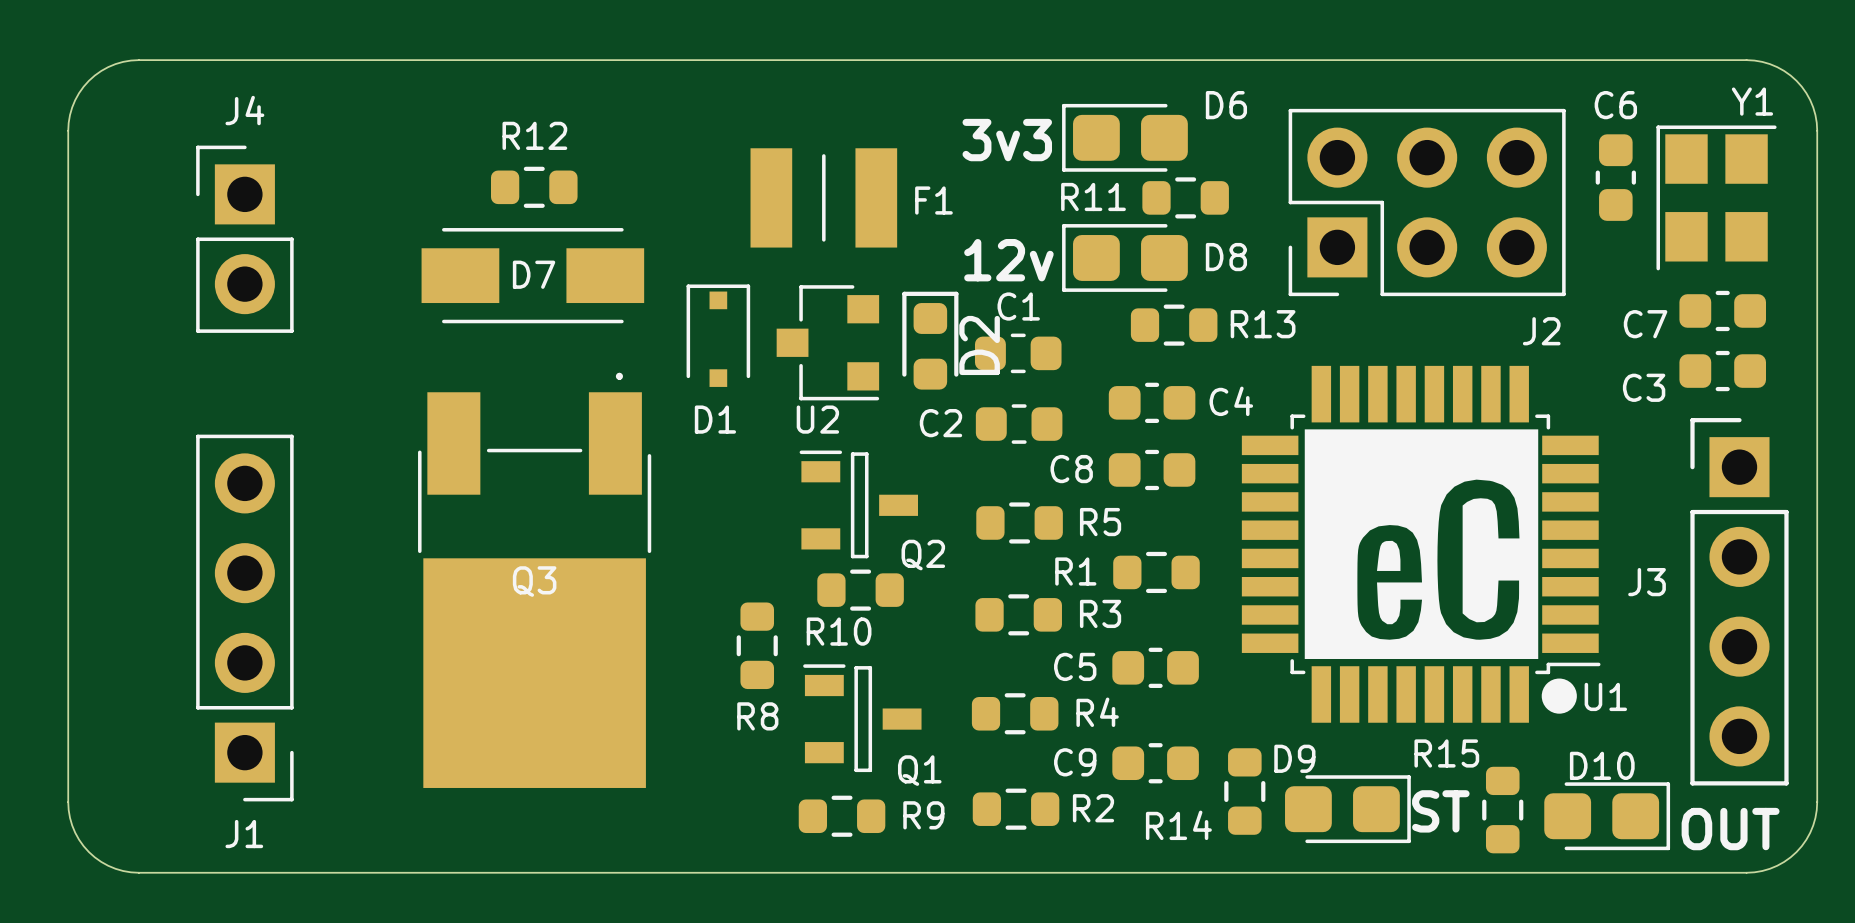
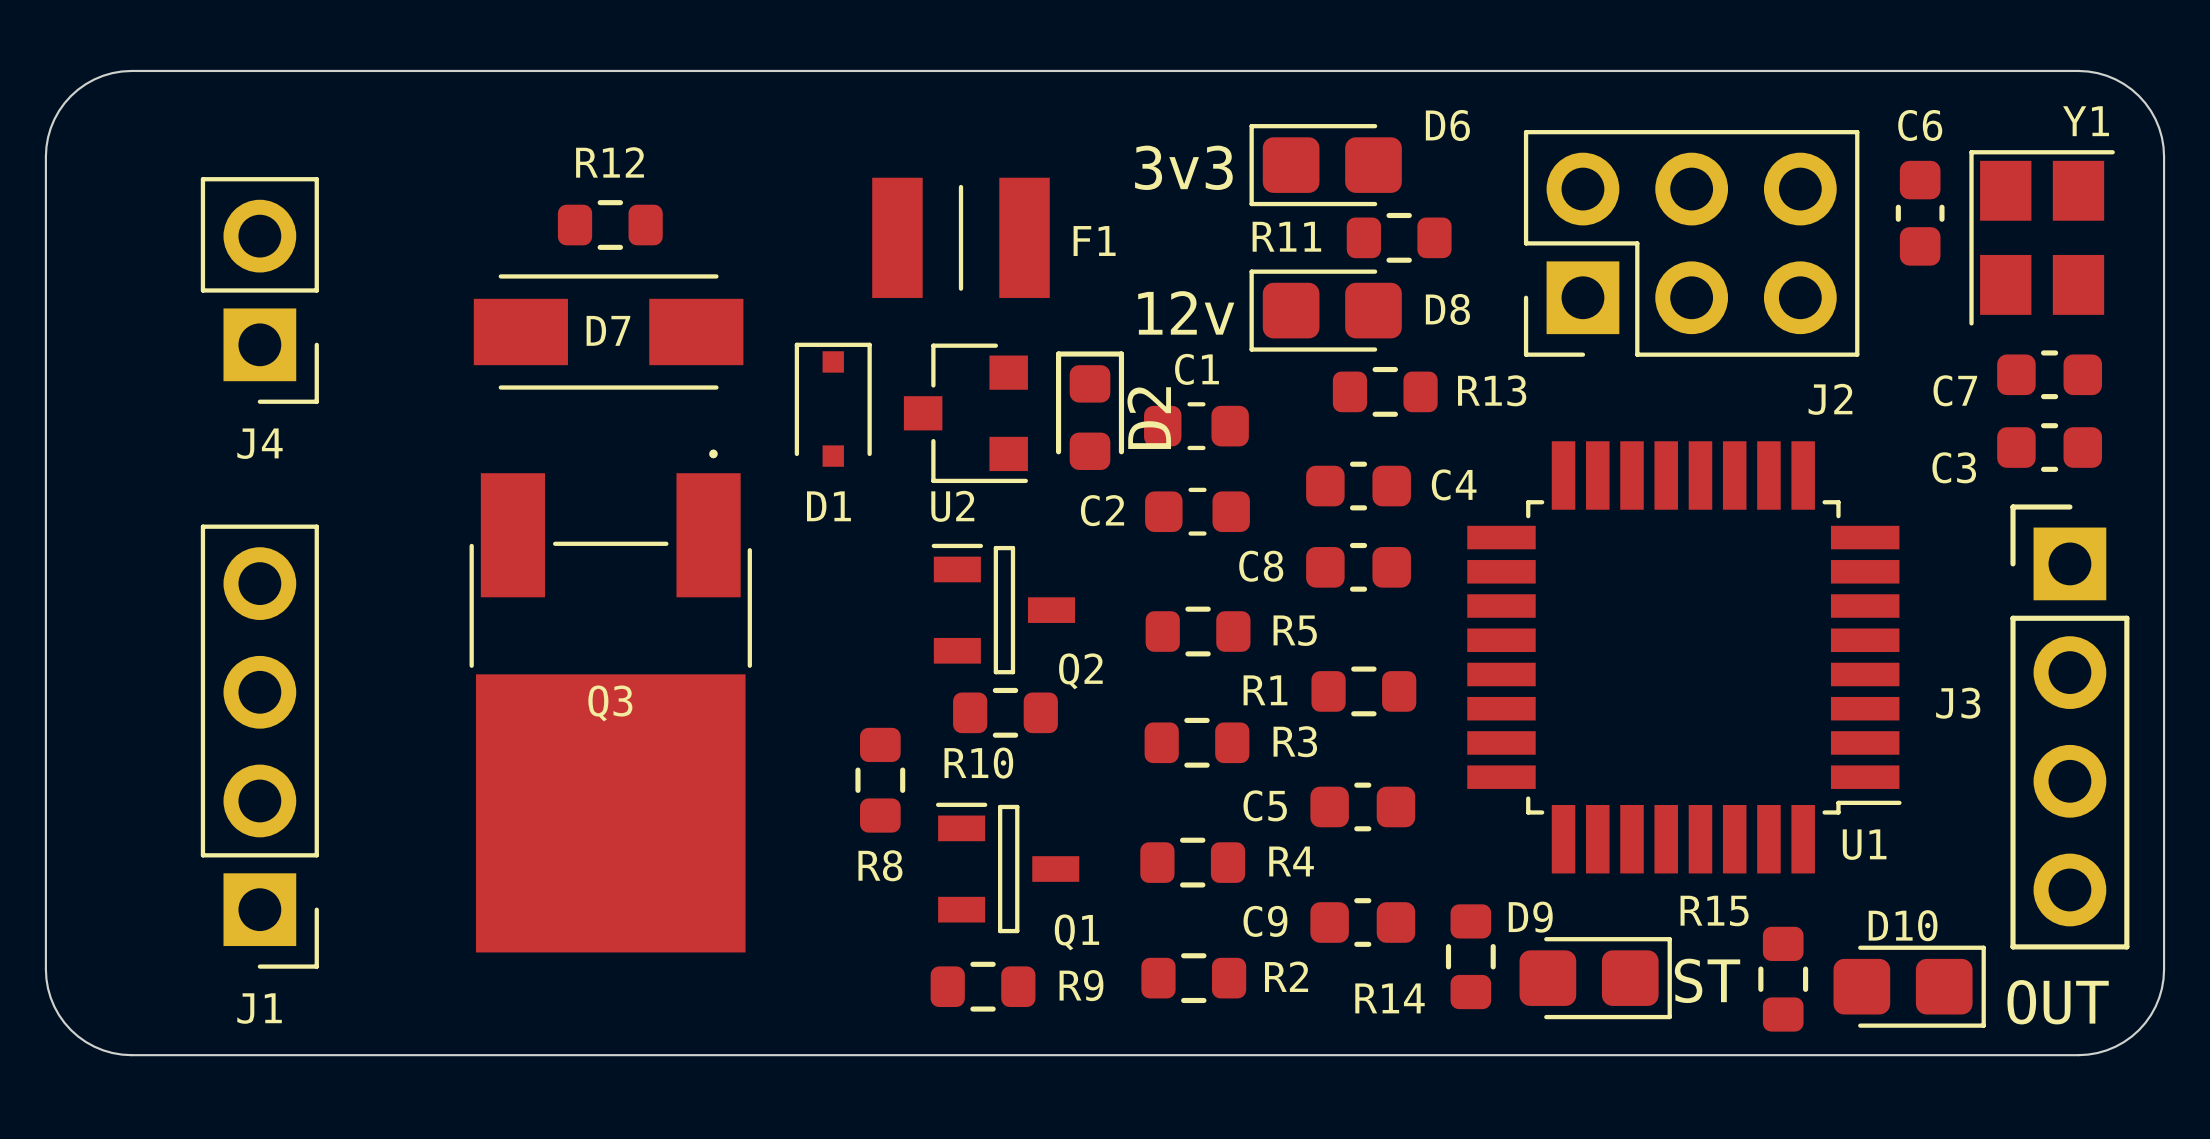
J4 rotation: 0° (244, 239) -> 180° (259, 290)
drawing: [1304, 429, 1577, 714] -> none
U1 name position: U1 (1605, 696) -> U1 (1864, 844)

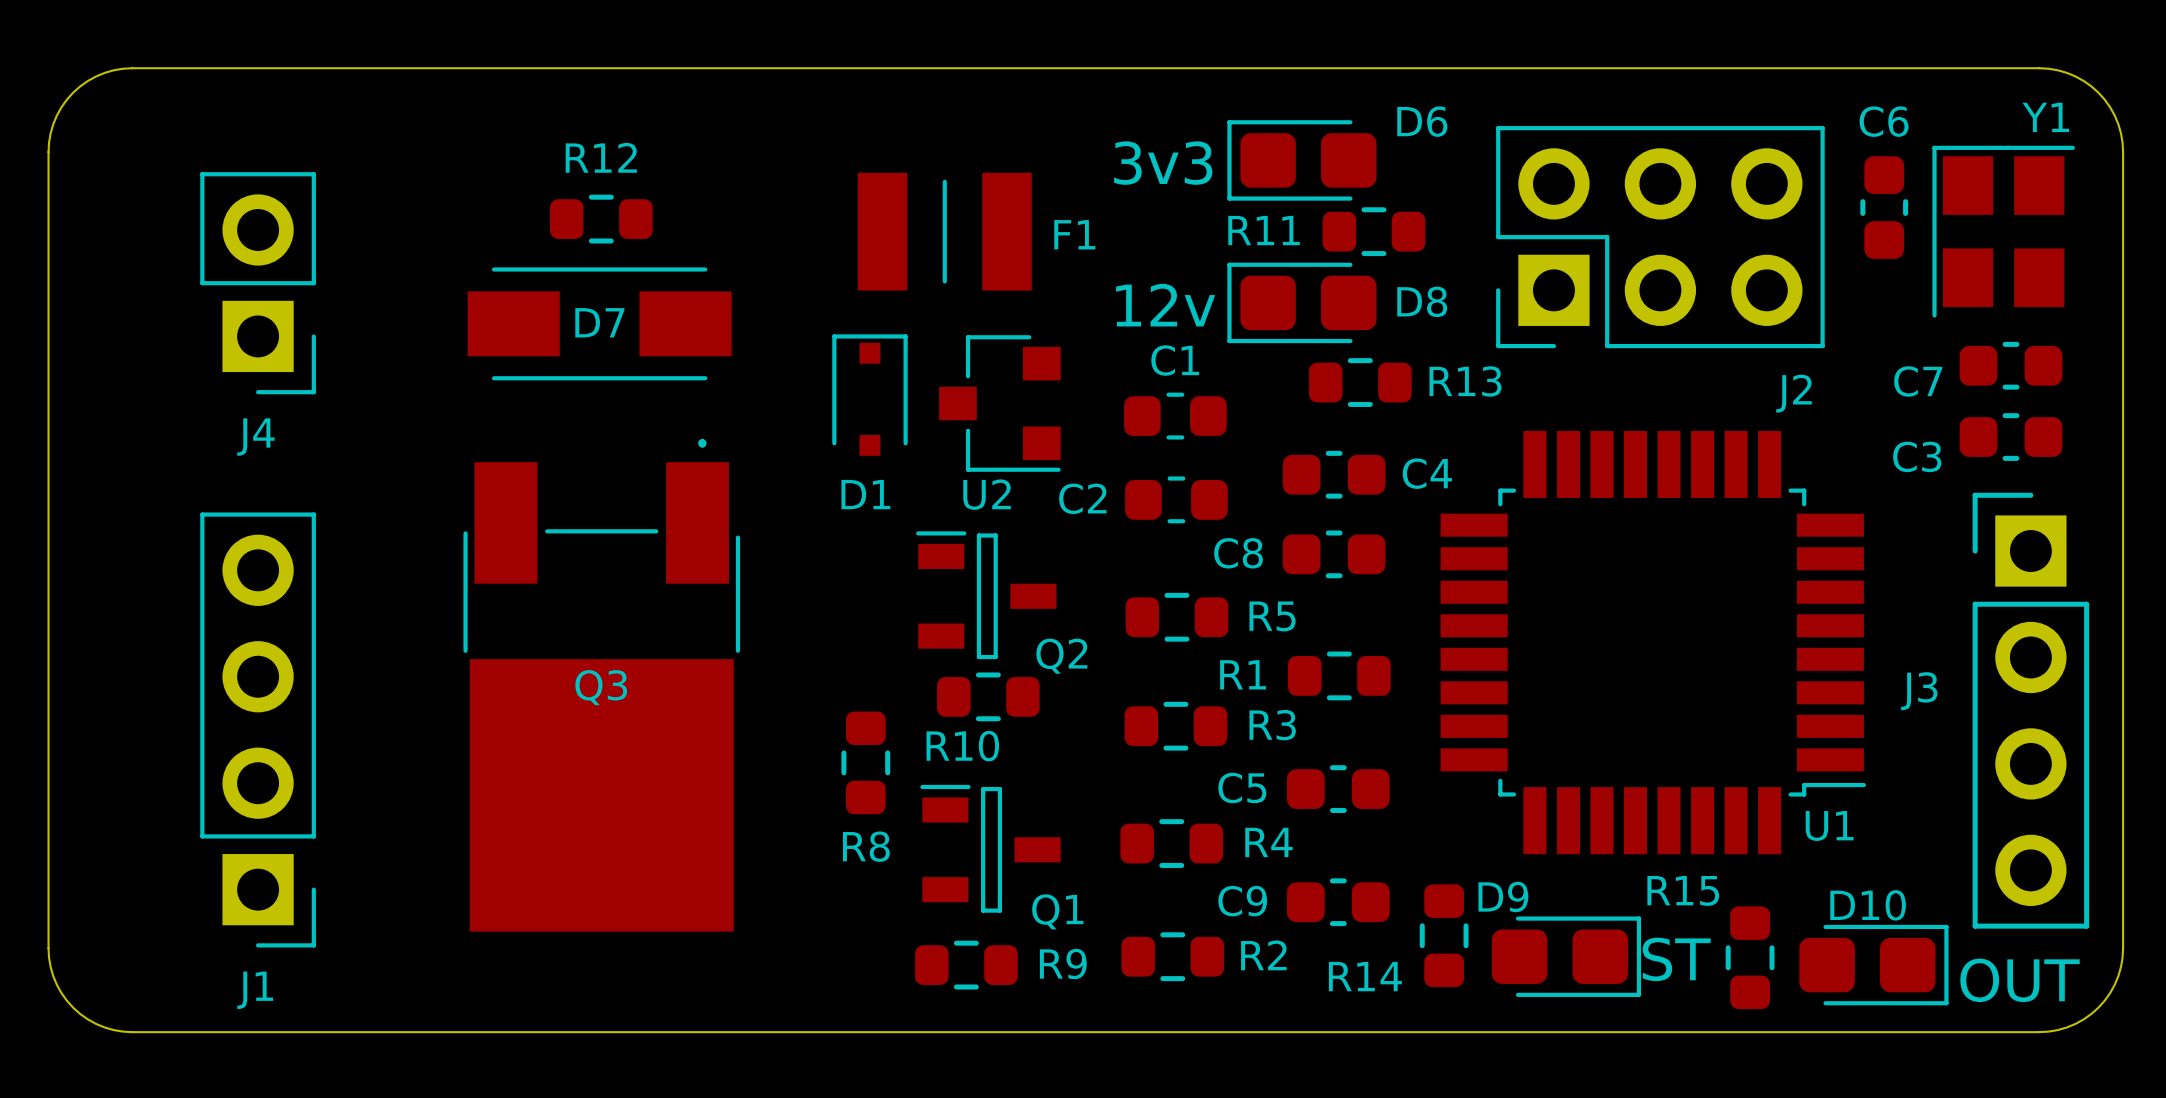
D1 position: (833, 404) -> (869, 395)
D2: (1090, 410) -> none
U2 position: (965, 413) -> (999, 403)

